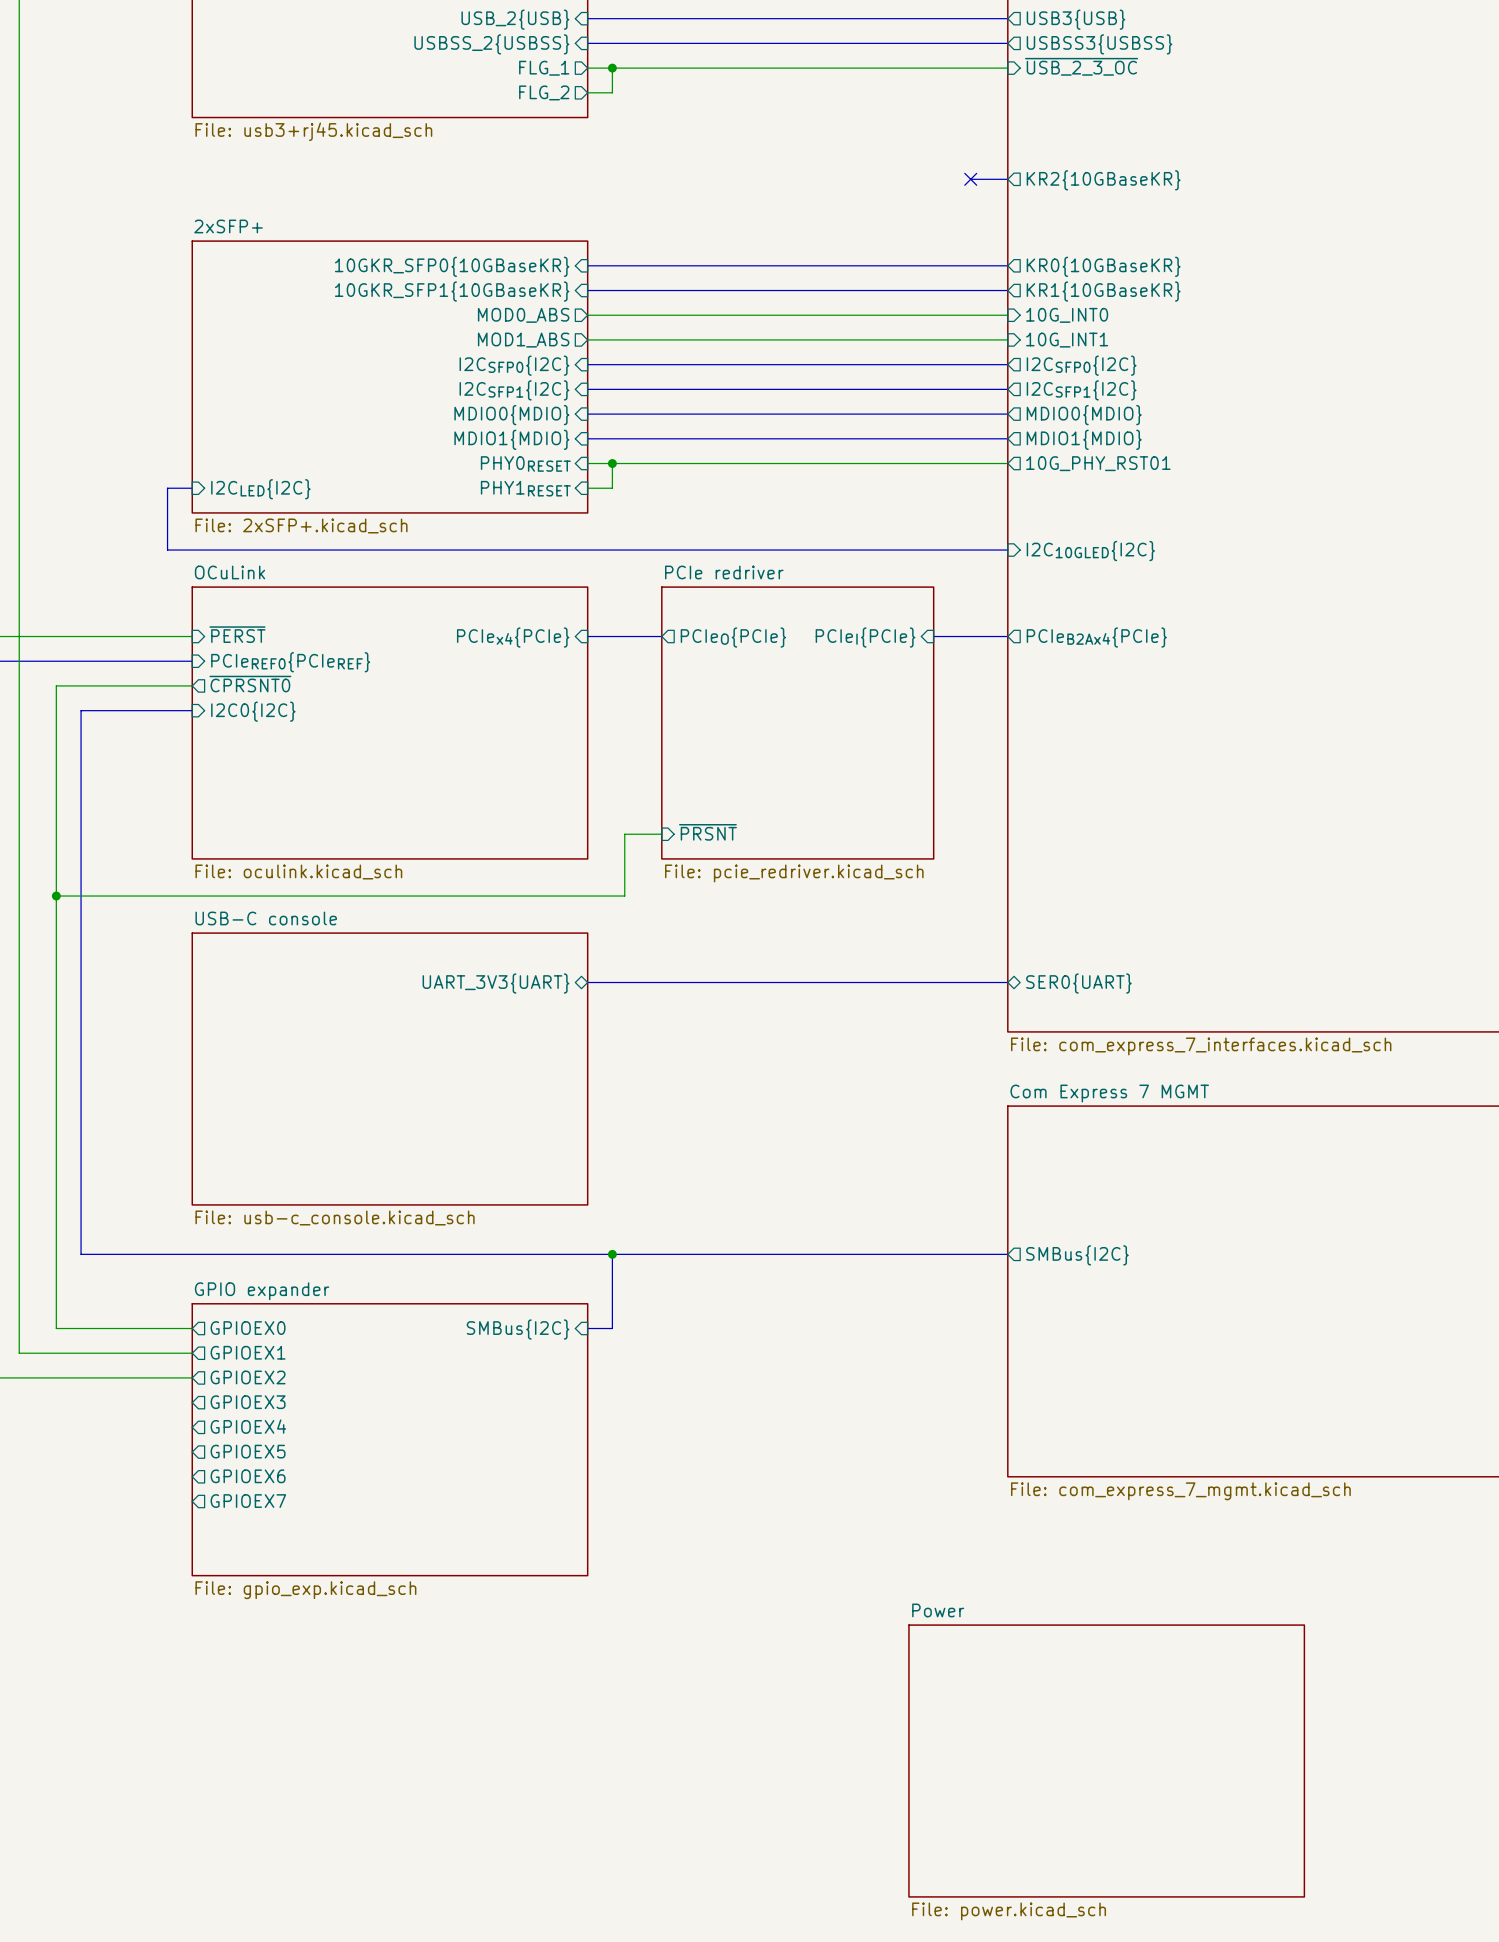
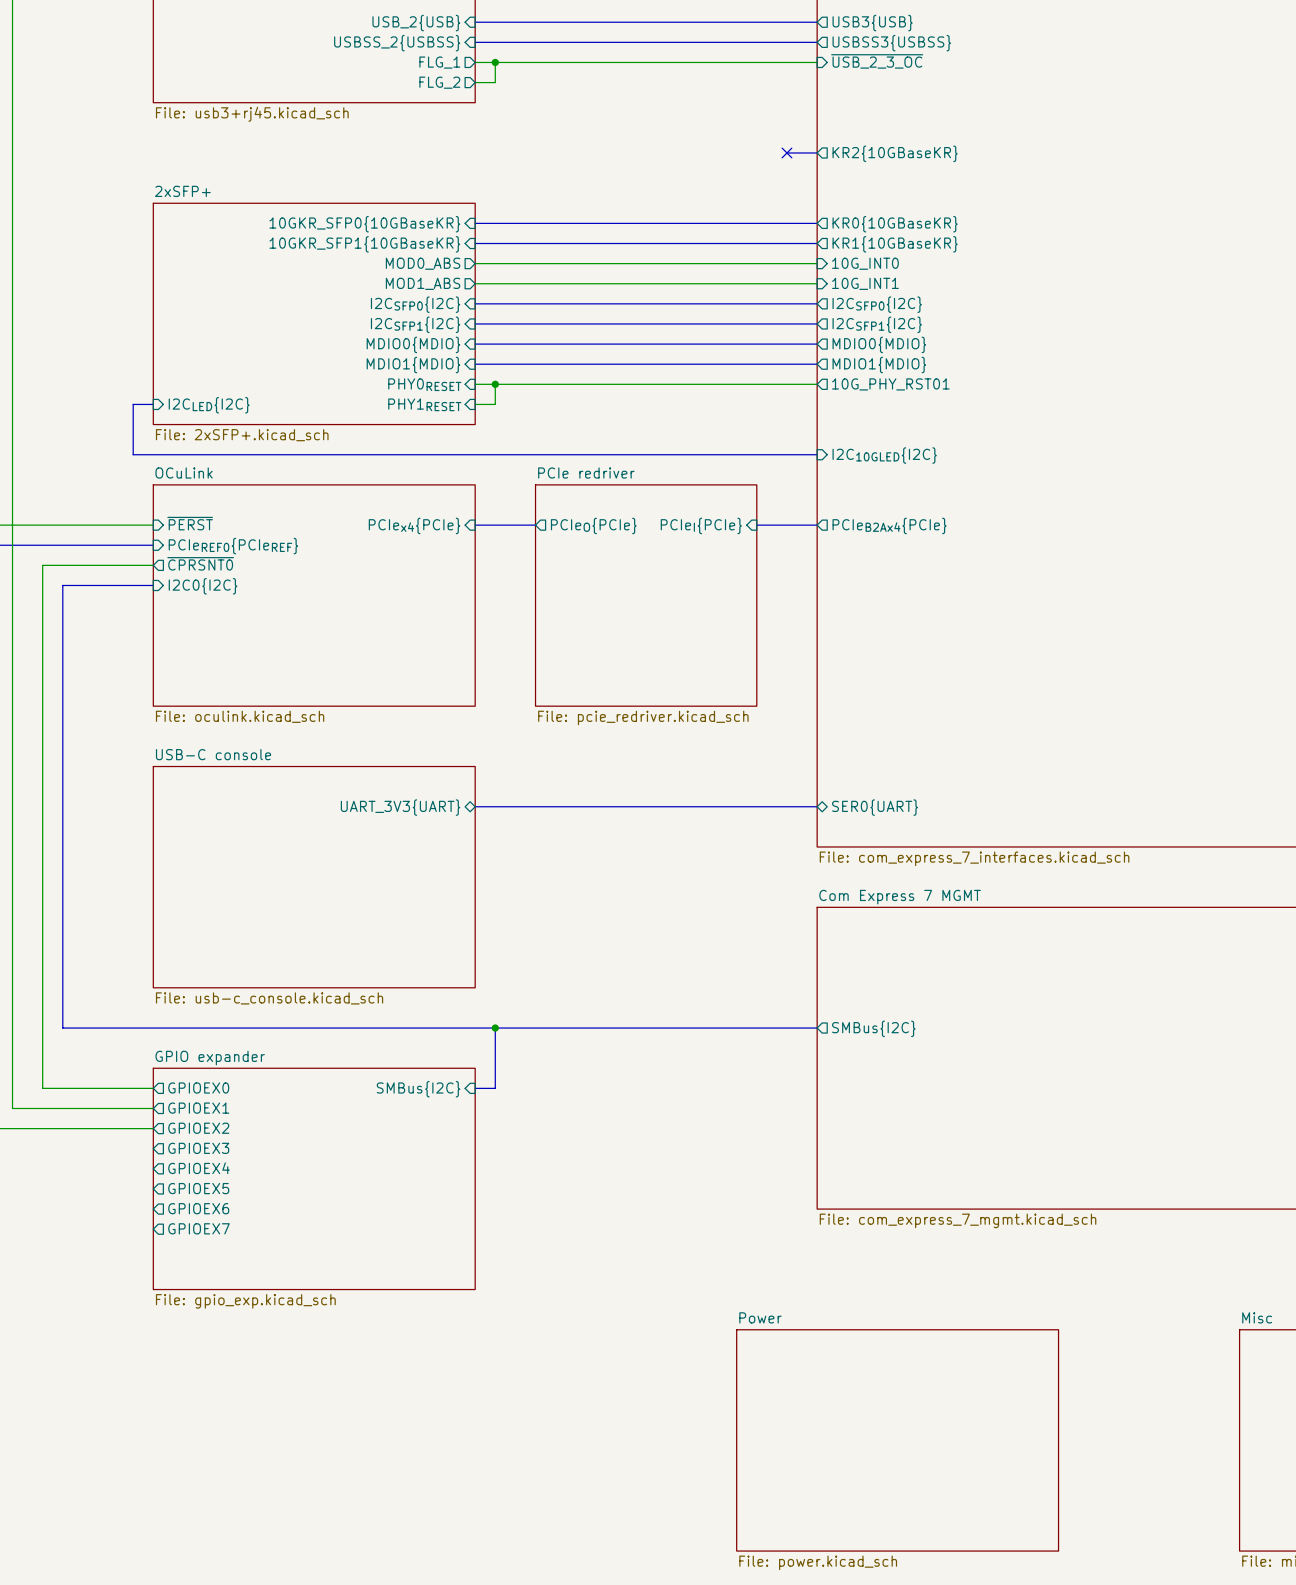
sheet pin: ~{PRSNT} (707, 832) -> none
wire: (661, 834) (624, 834) (624, 896) (56, 896) -> none
junction: (56, 896) -> none

